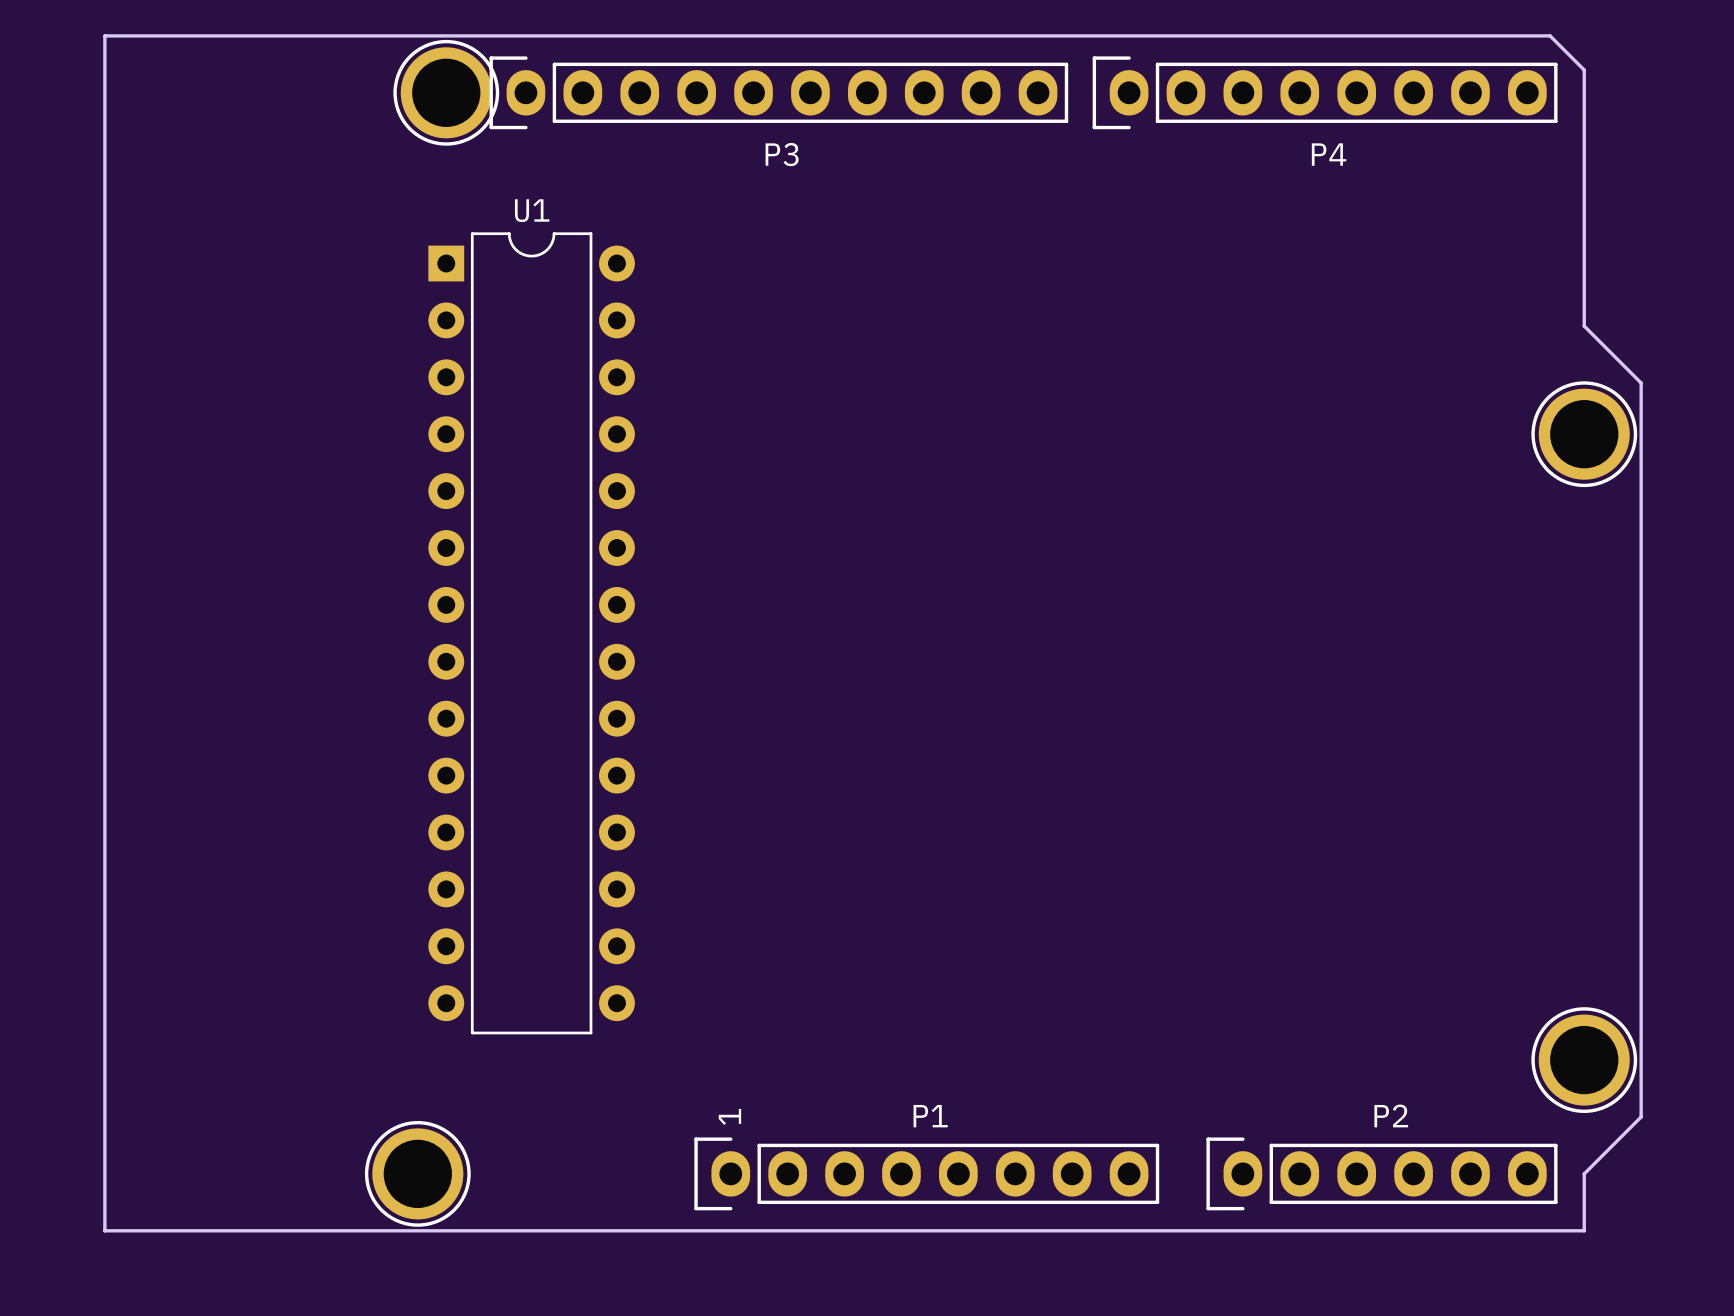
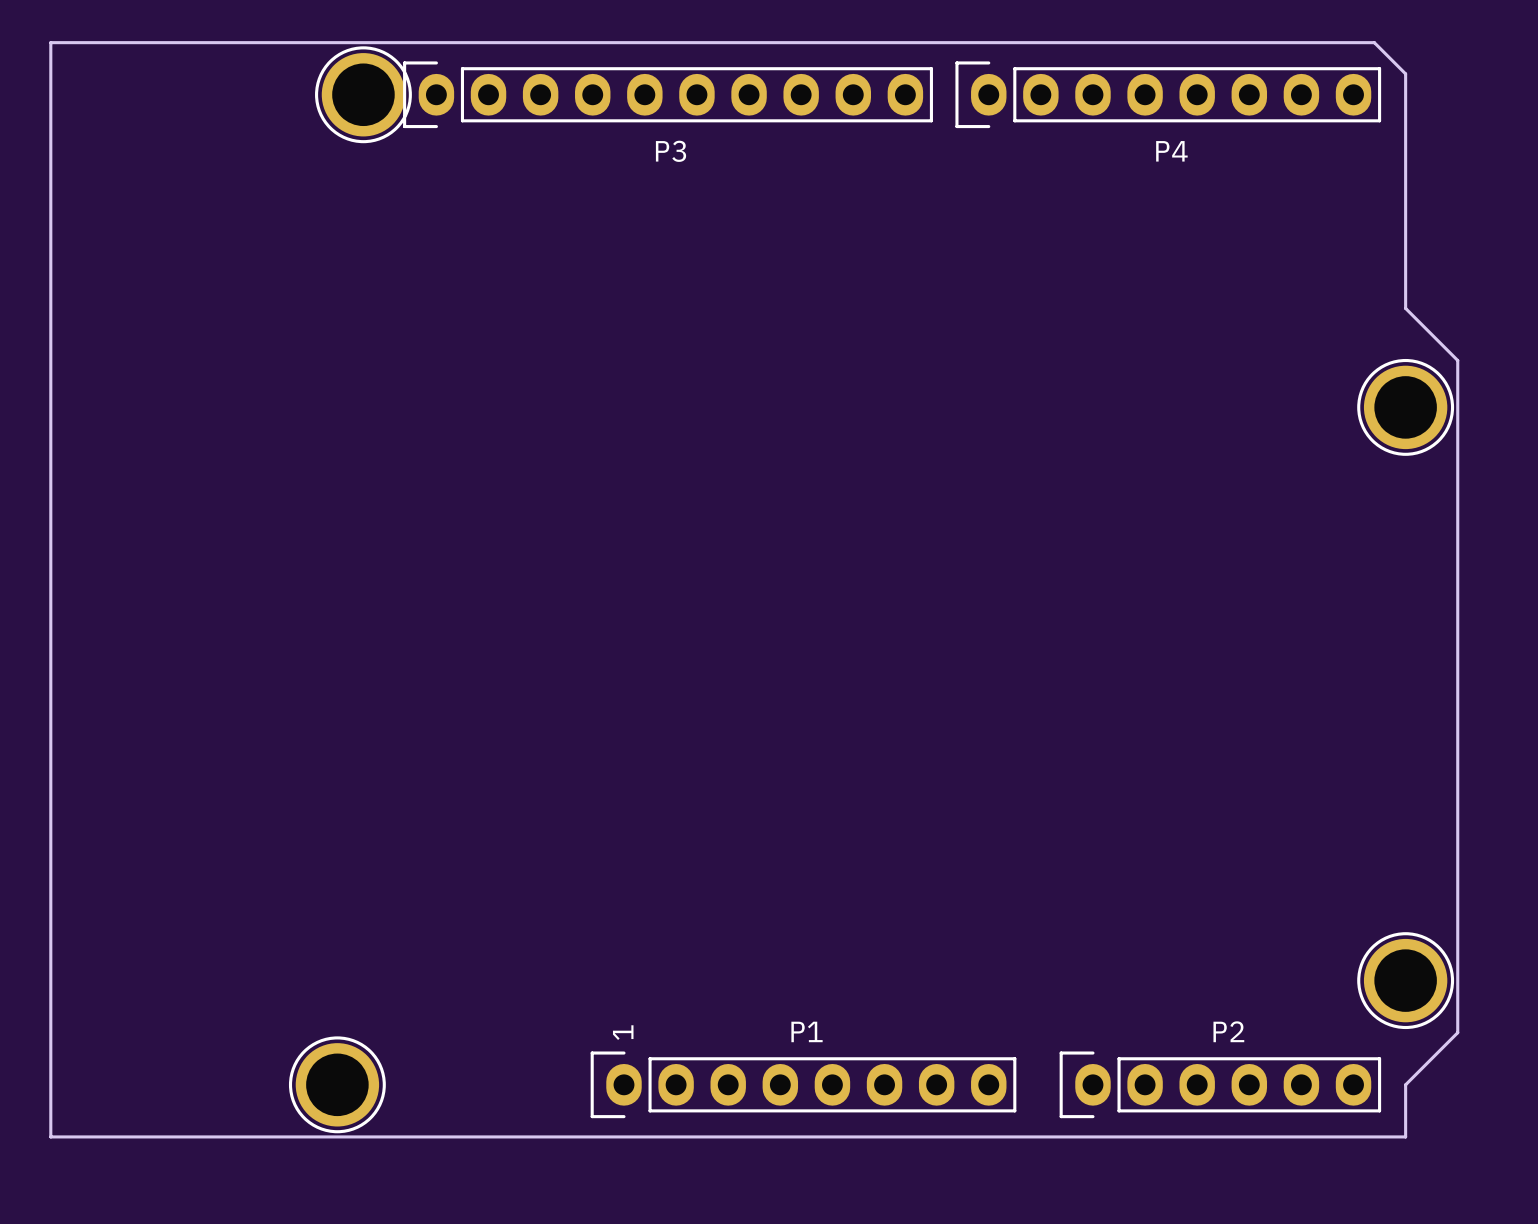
U1: (531, 633) -> none

